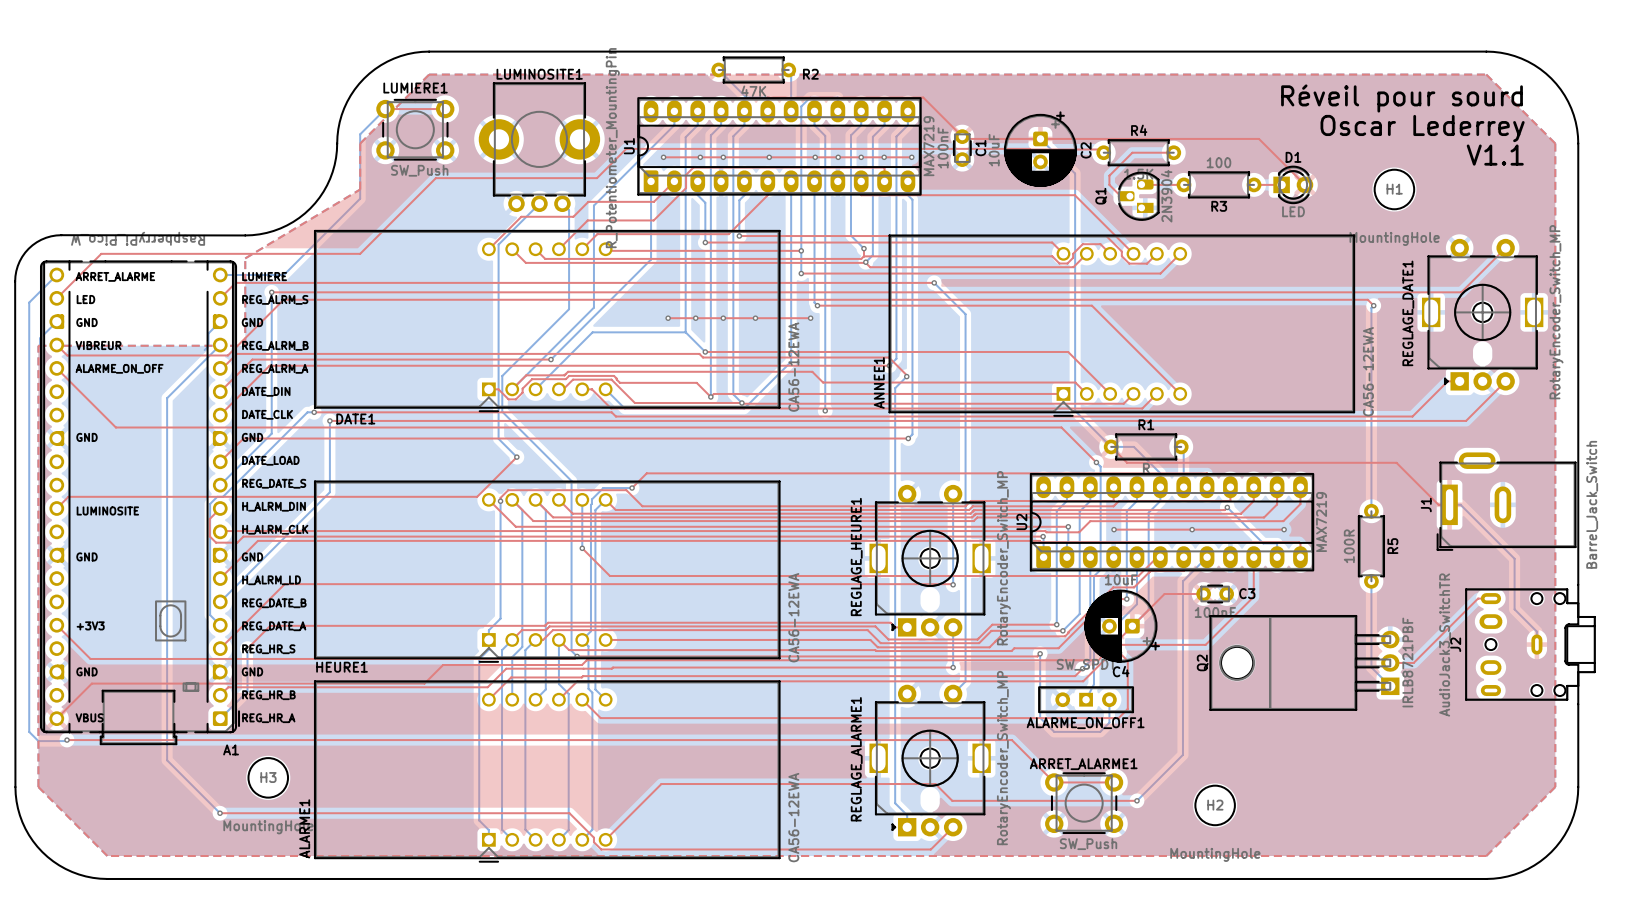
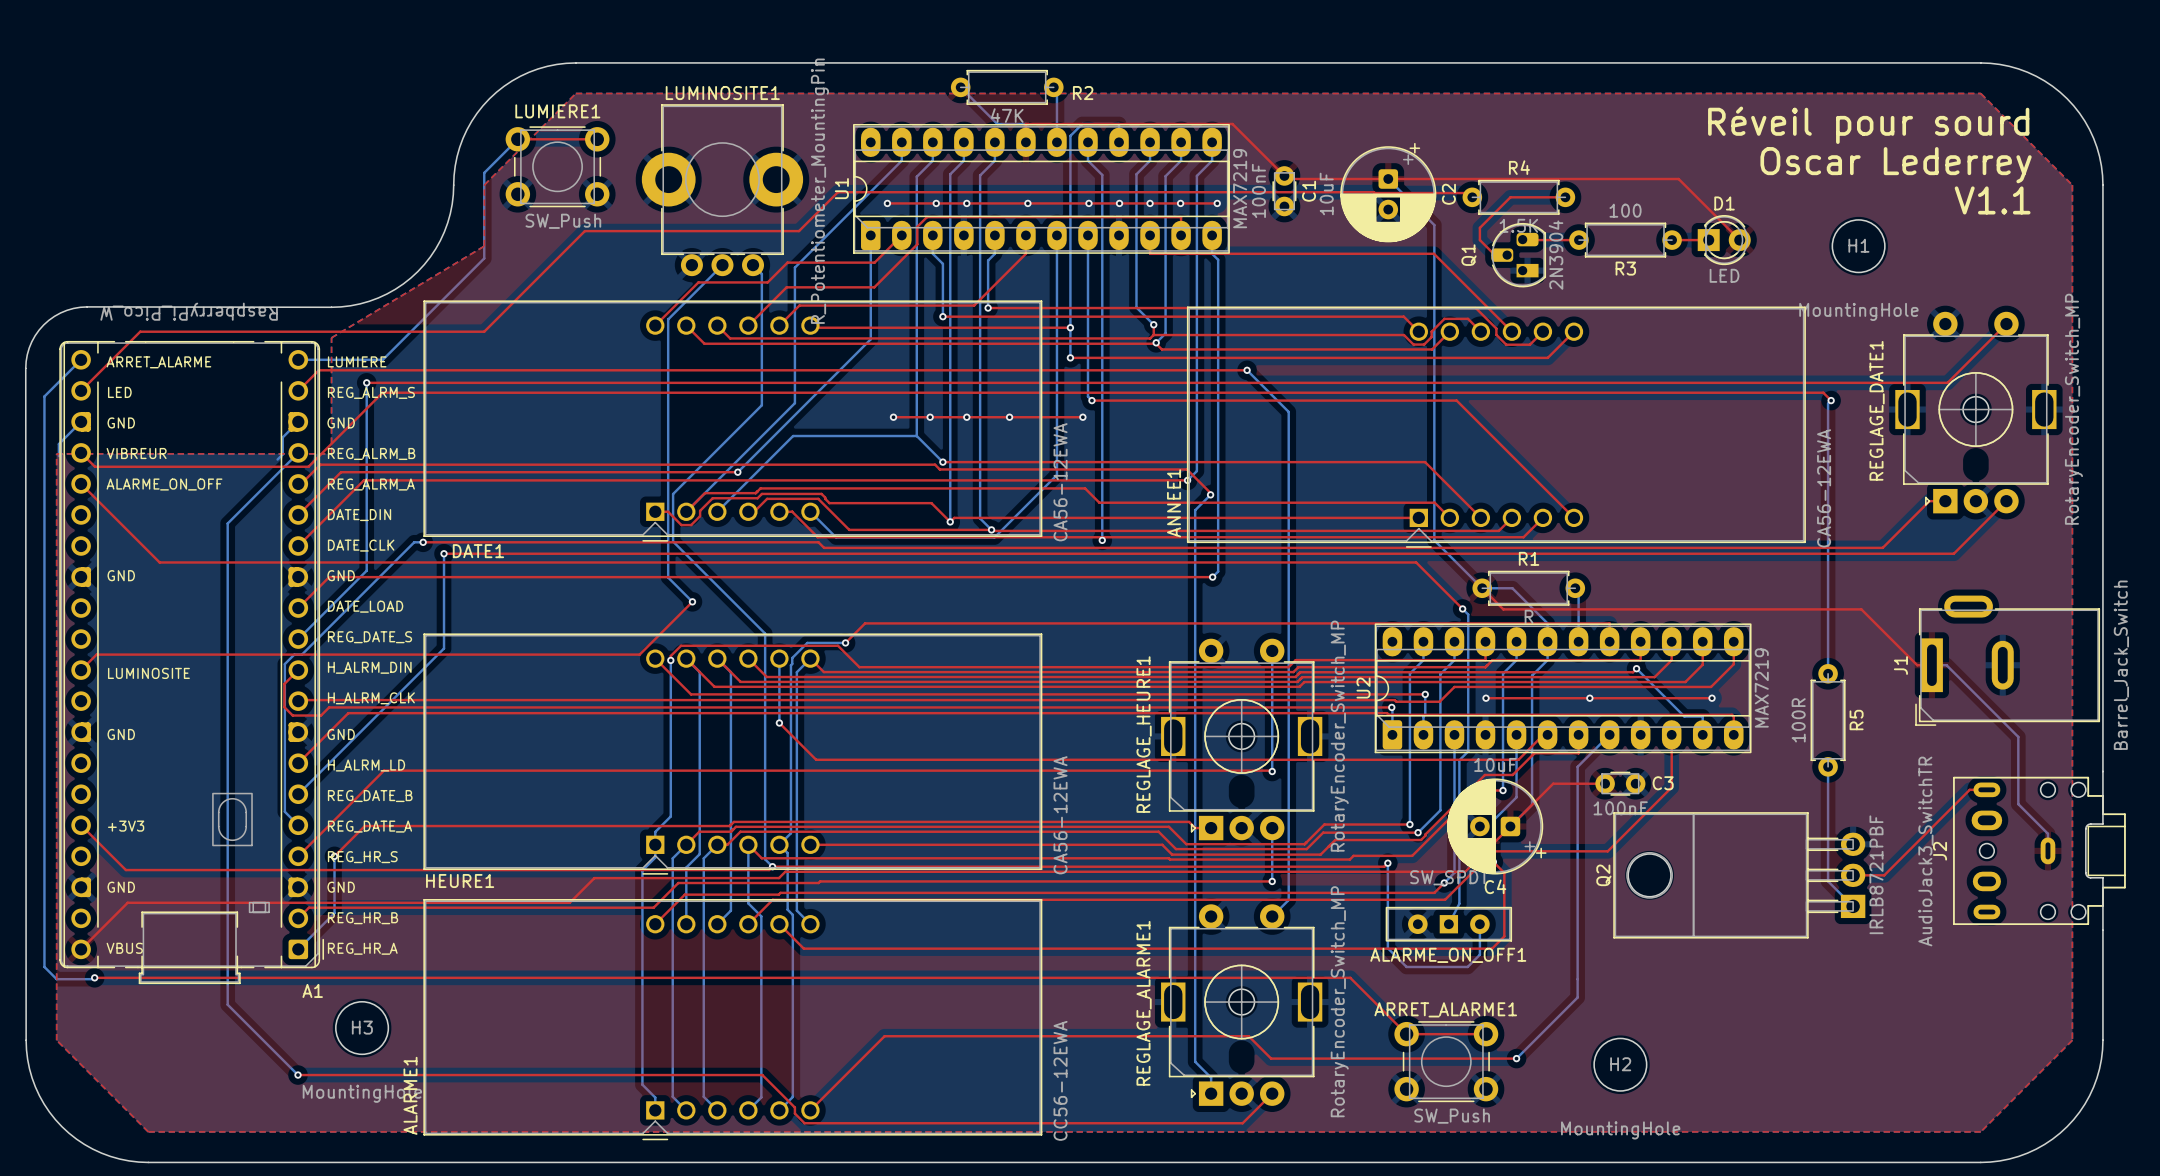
ALARME1 value: CA56-12EWA (793, 817) -> CC56-12EWA (1060, 1080)

